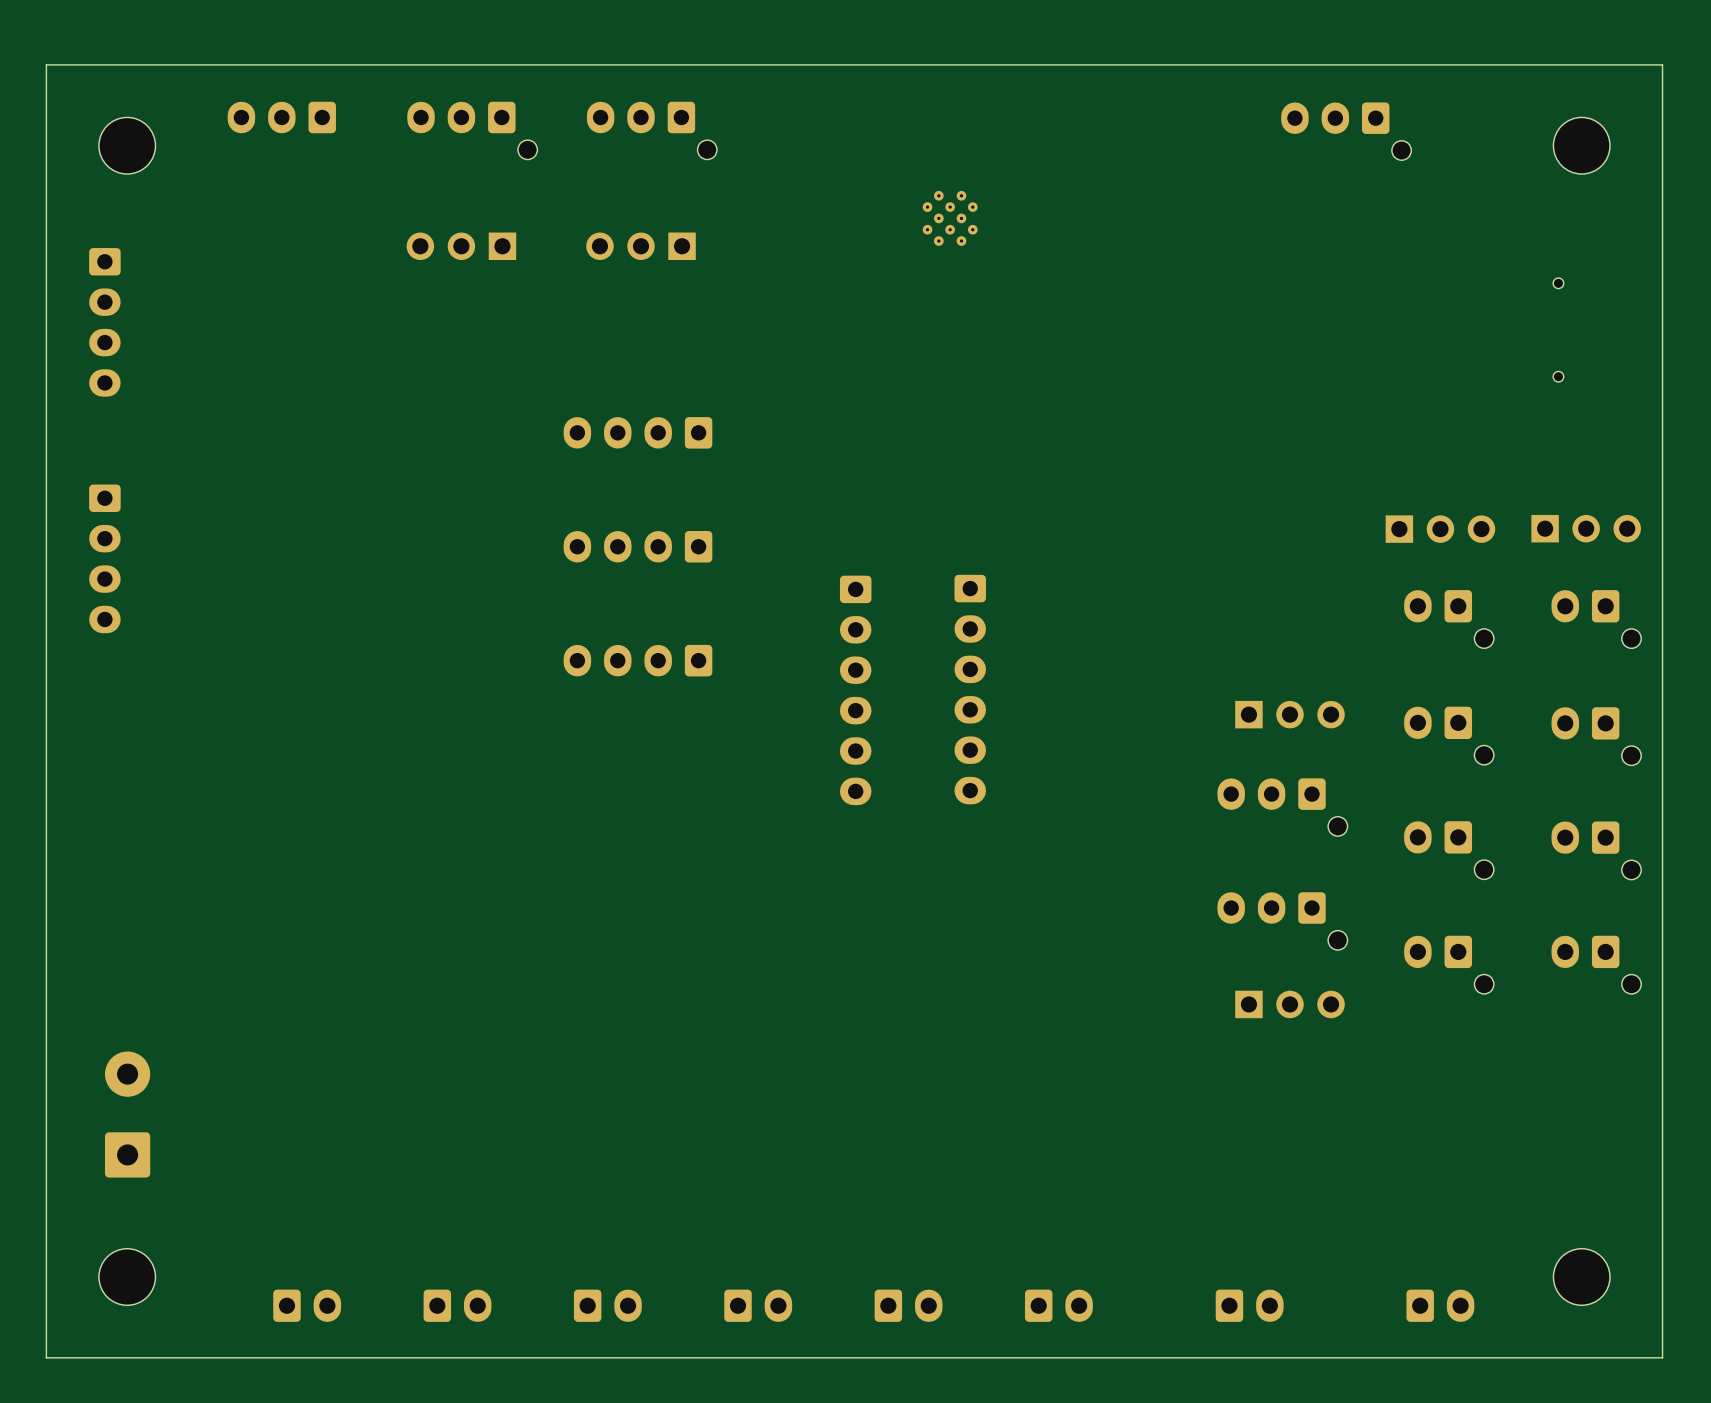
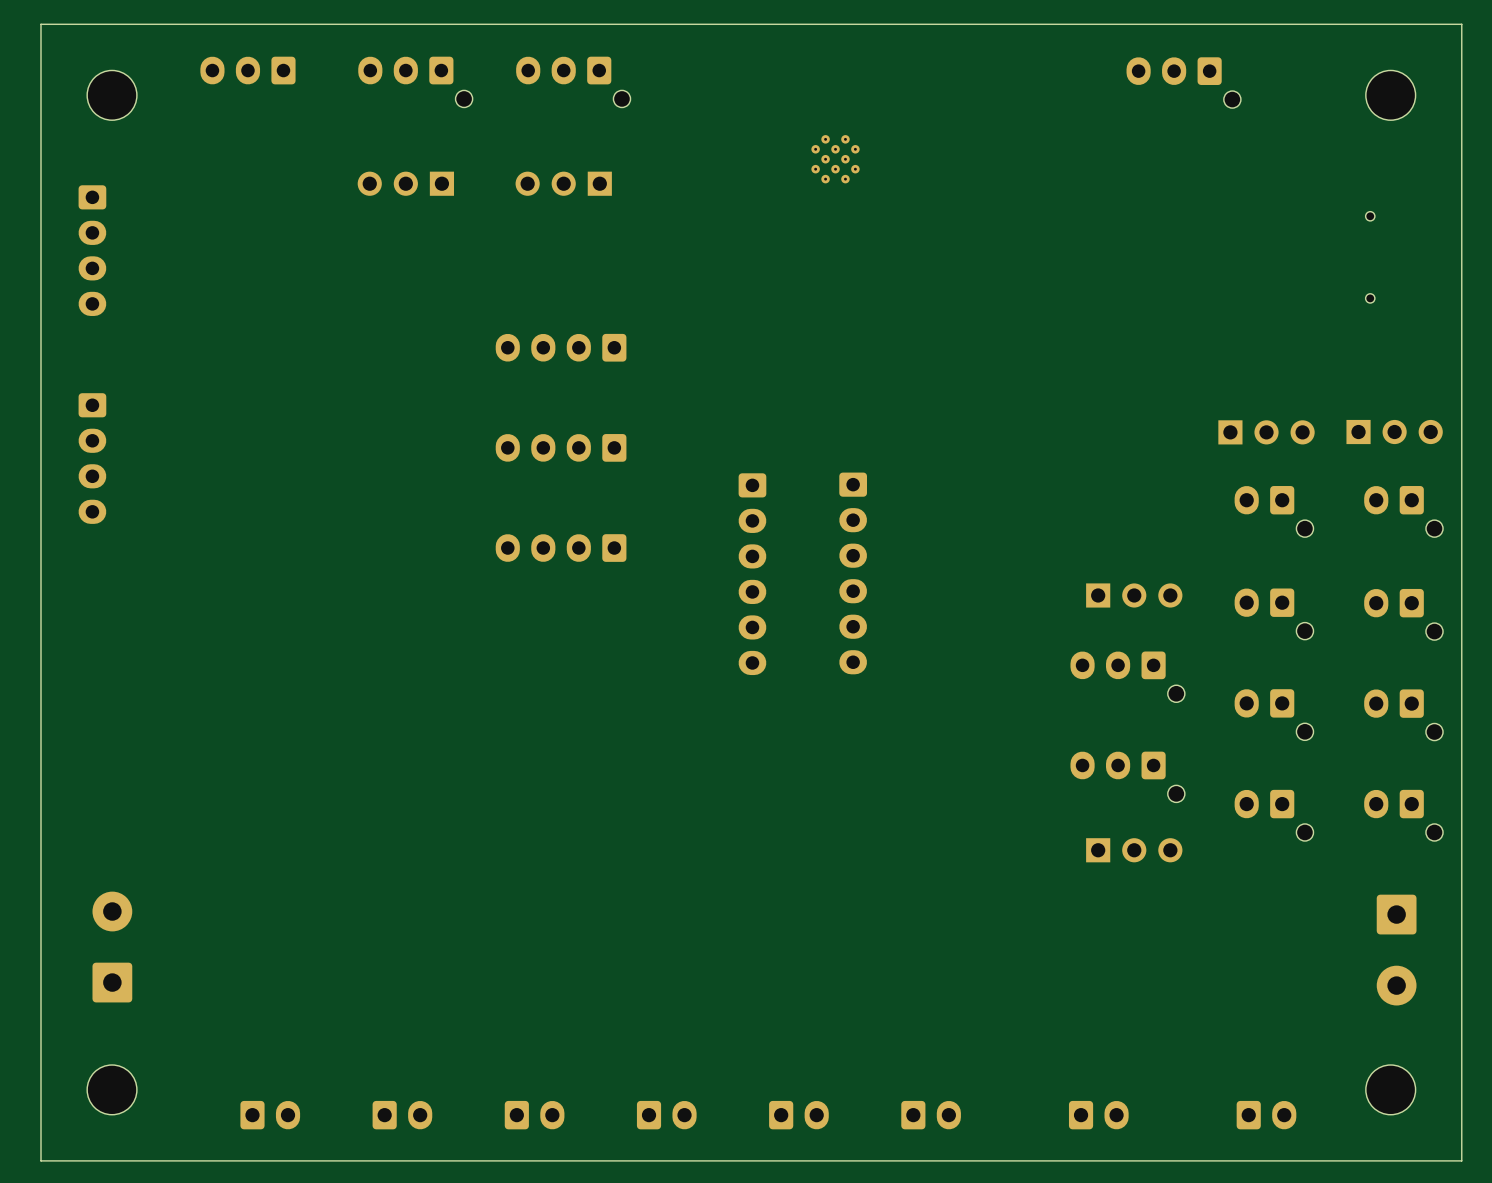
part: none -> (1396, 950)

